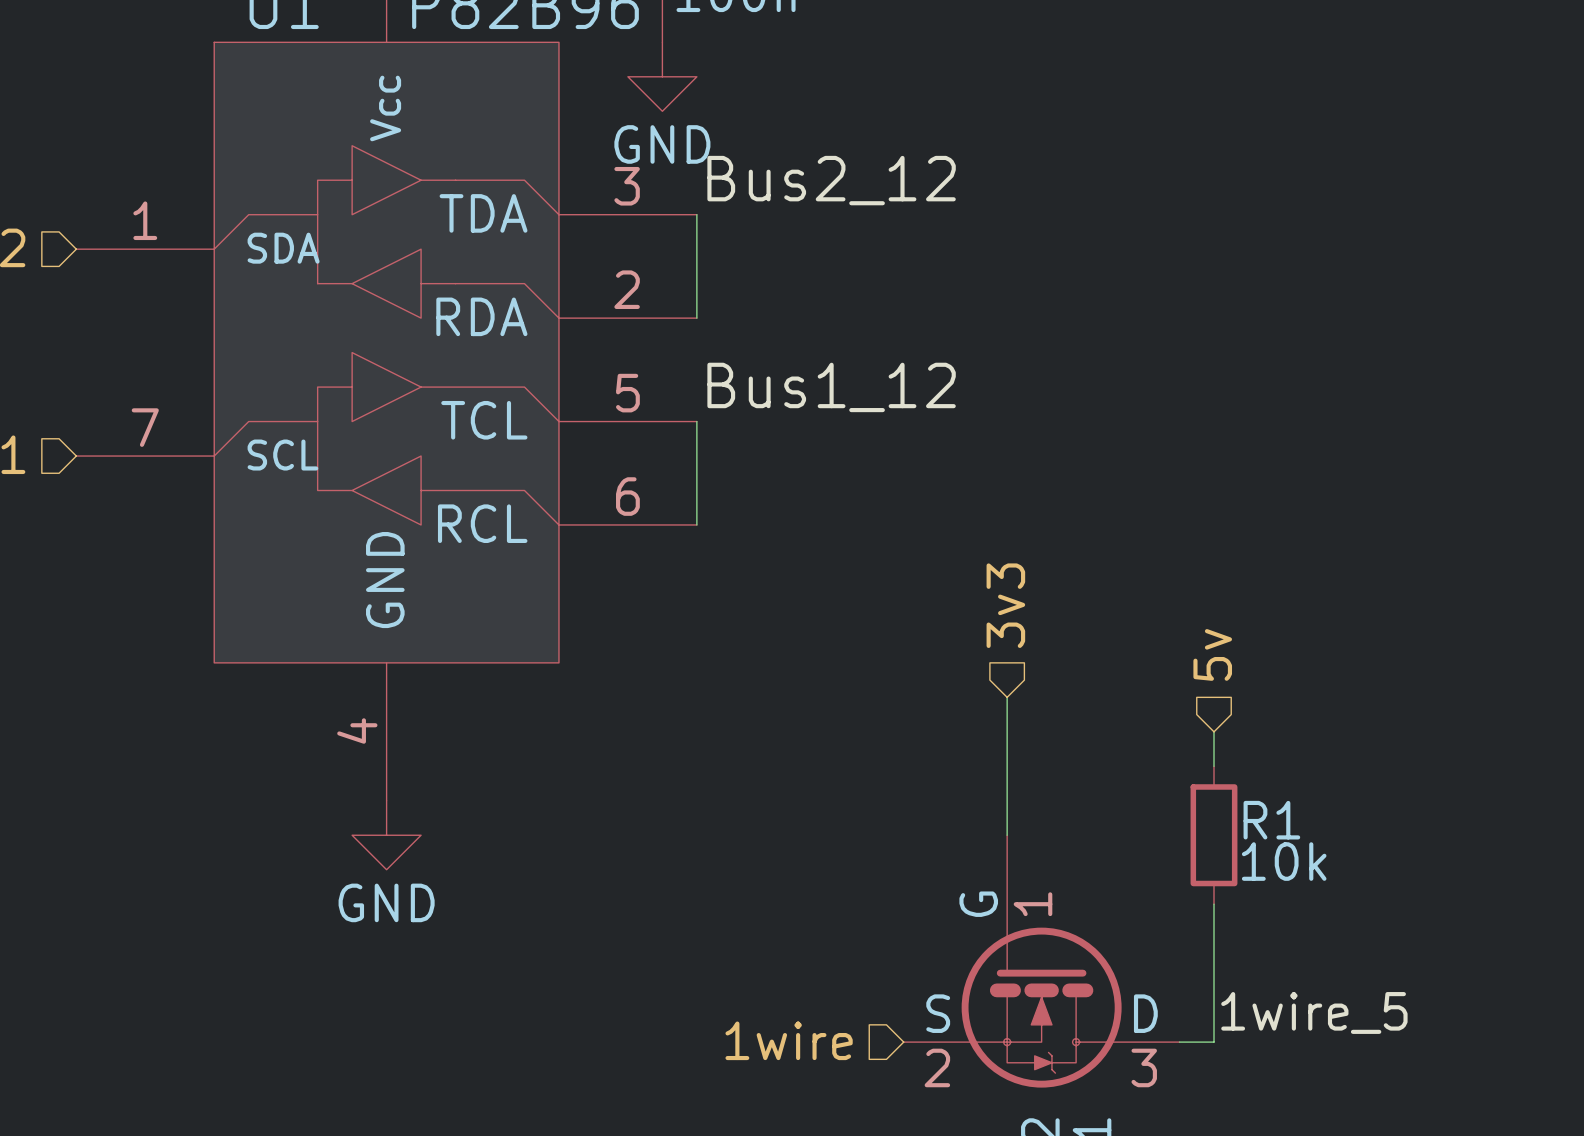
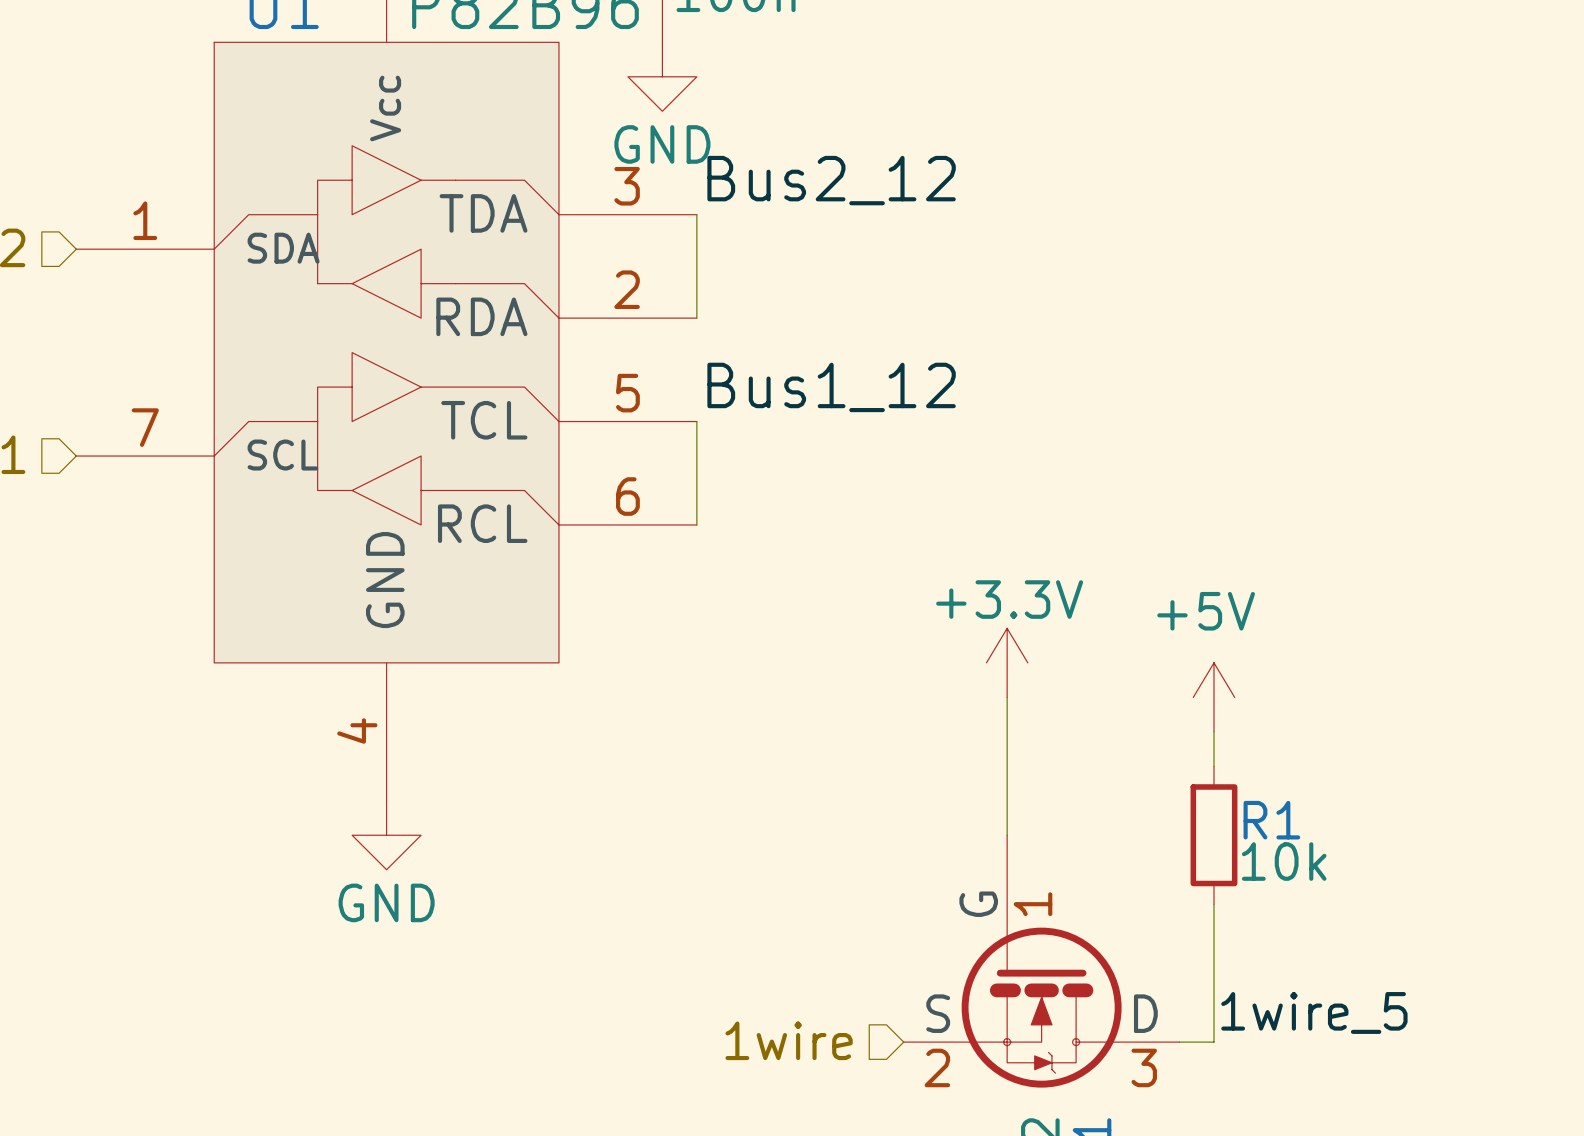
hierarchical label: 3v3 (1005, 605) -> none
hierarchical label: 5v (1212, 654) -> none
power symbol: none -> +3.3V (1007, 662)
power symbol: none -> +5V (1214, 697)

